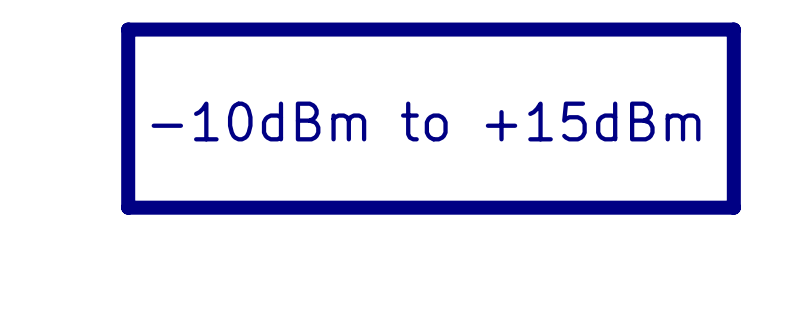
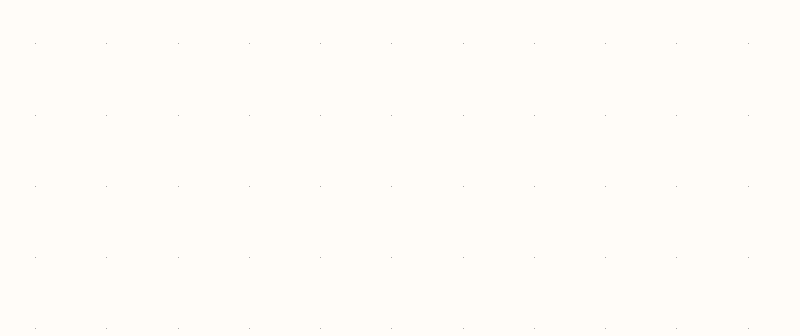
line: (128, 29) (733, 29) (733, 207) (128, 207) (128, 29) -> none
text: -10dBm to +15dBm (426, 121) -> none

